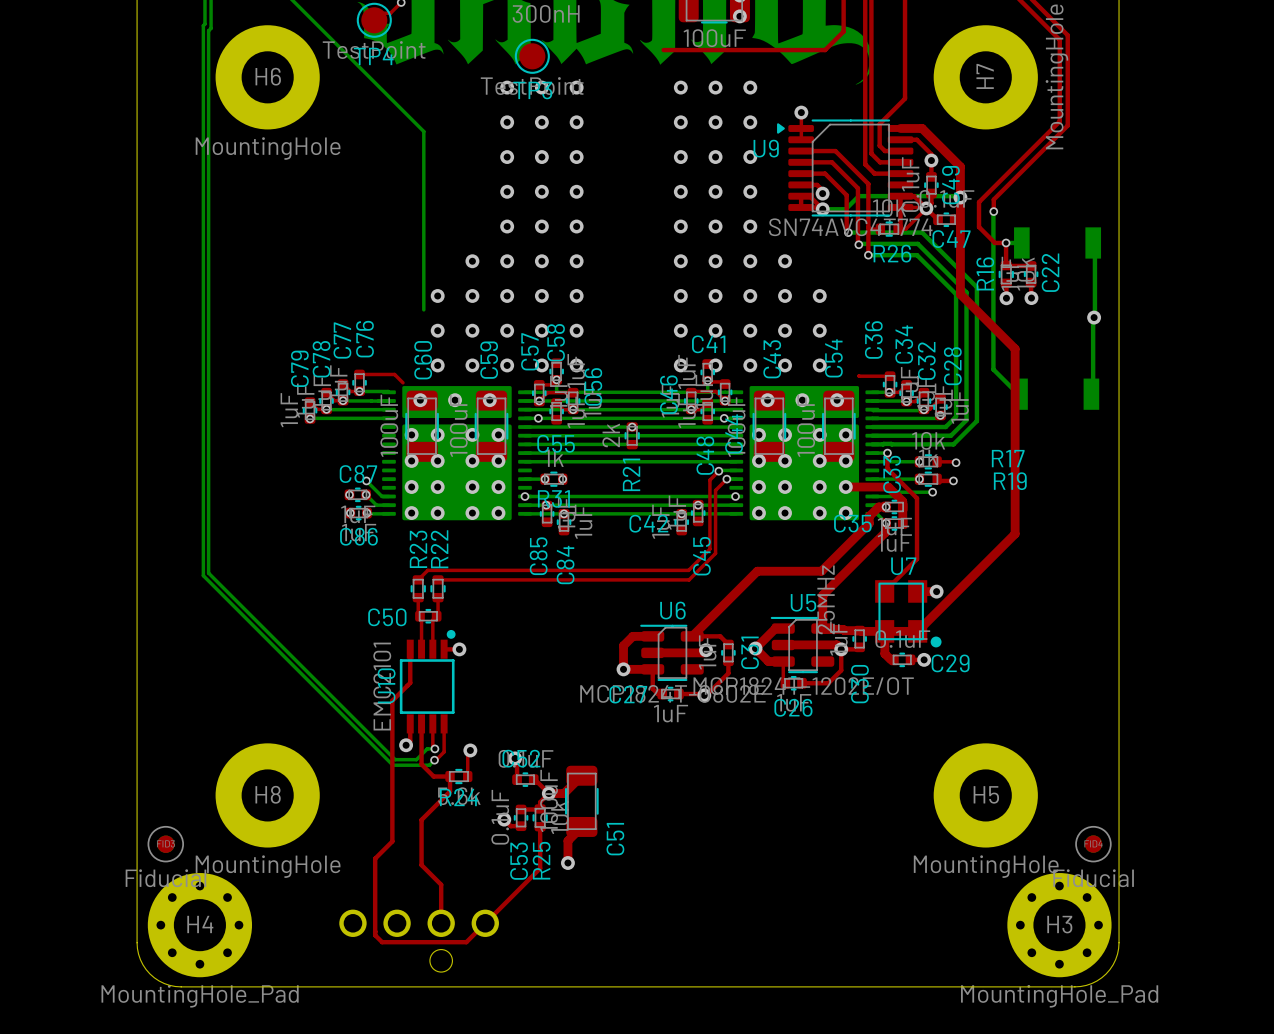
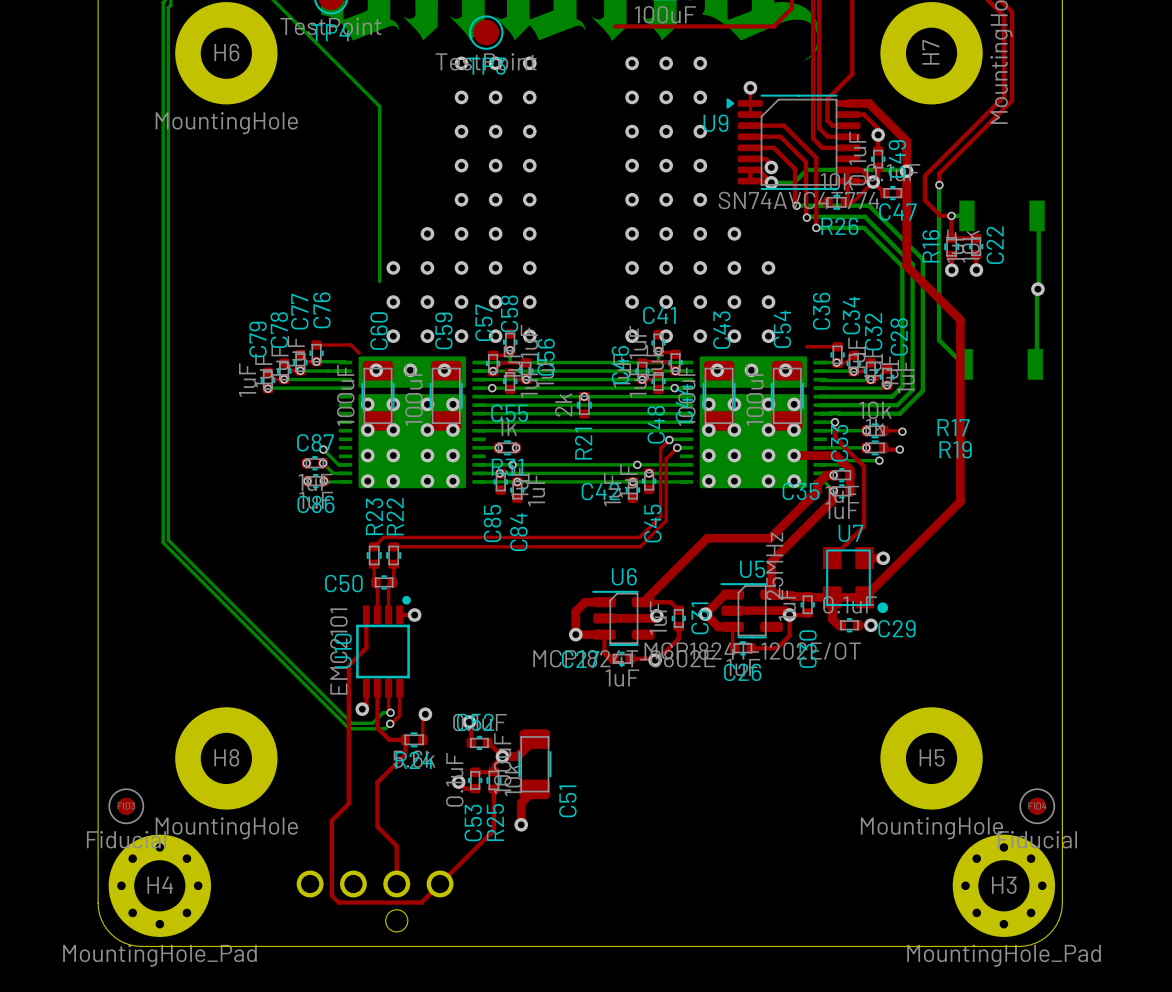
via position: (524, 496) -> (512, 464)
via position: (735, 496) -> (637, 464)

